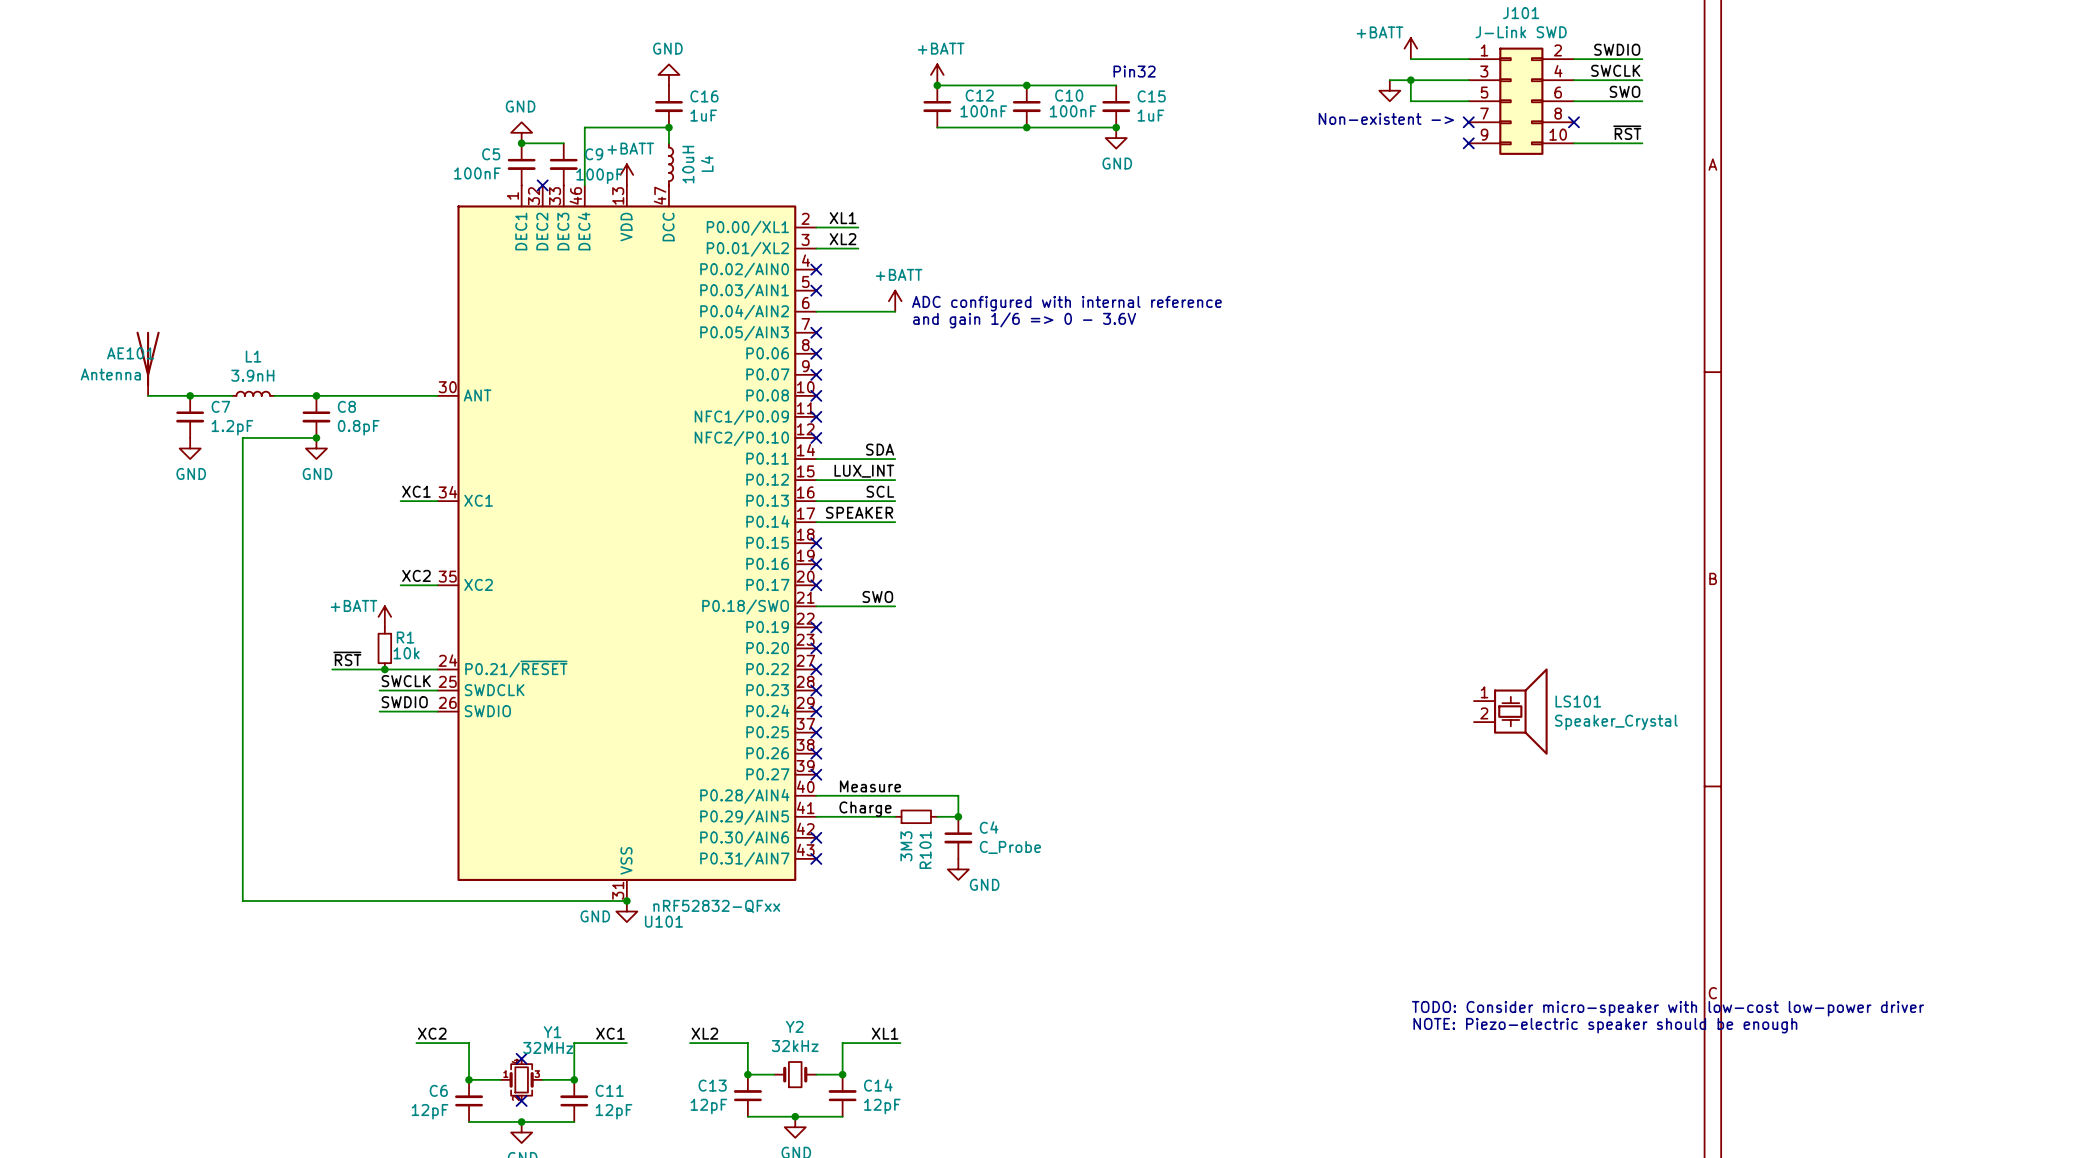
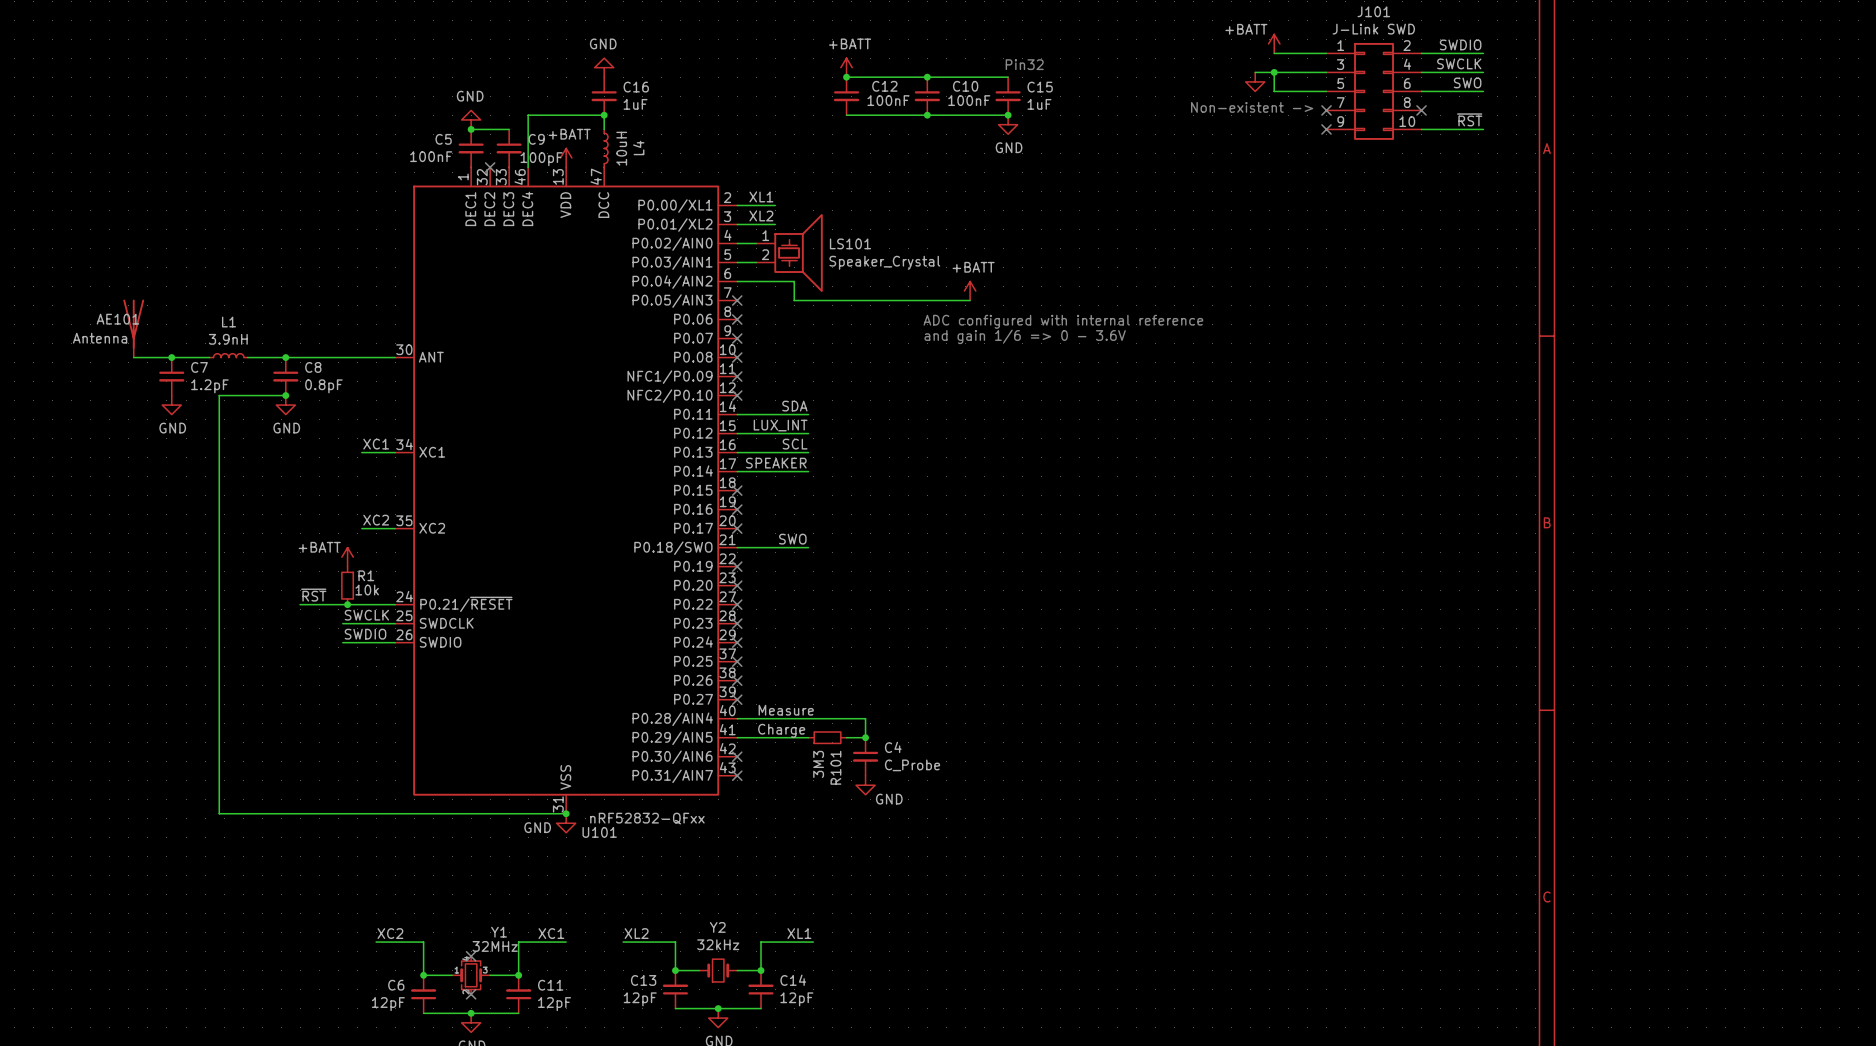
wire: none -> (737, 243) (756, 243)
no-connect mark: (816, 269) -> none
wire: none -> (737, 262) (756, 262)
no-connect mark: (816, 290) -> none
power symbol position: +BATT (895, 301) -> +BATT (970, 291)
text position: ADC configured with internal reference (1066, 303) -> ADC configured with internal reference (1063, 321)
wire: (879, 311) (895, 311) -> (794, 281) (794, 300) (970, 300)
text position: and gain 1/6 => 0 - 3.6V (1024, 320) -> and gain 1/6 => 0 - 3.6V (1025, 336)
LS101 position: (1510, 711) -> (789, 253)
text: TODO: Consider micro-speaker with low-cost low-power driver (1668, 1008) -> none
text: NOTE: Piezo-electric speaker should be enough (1605, 1025) -> none

